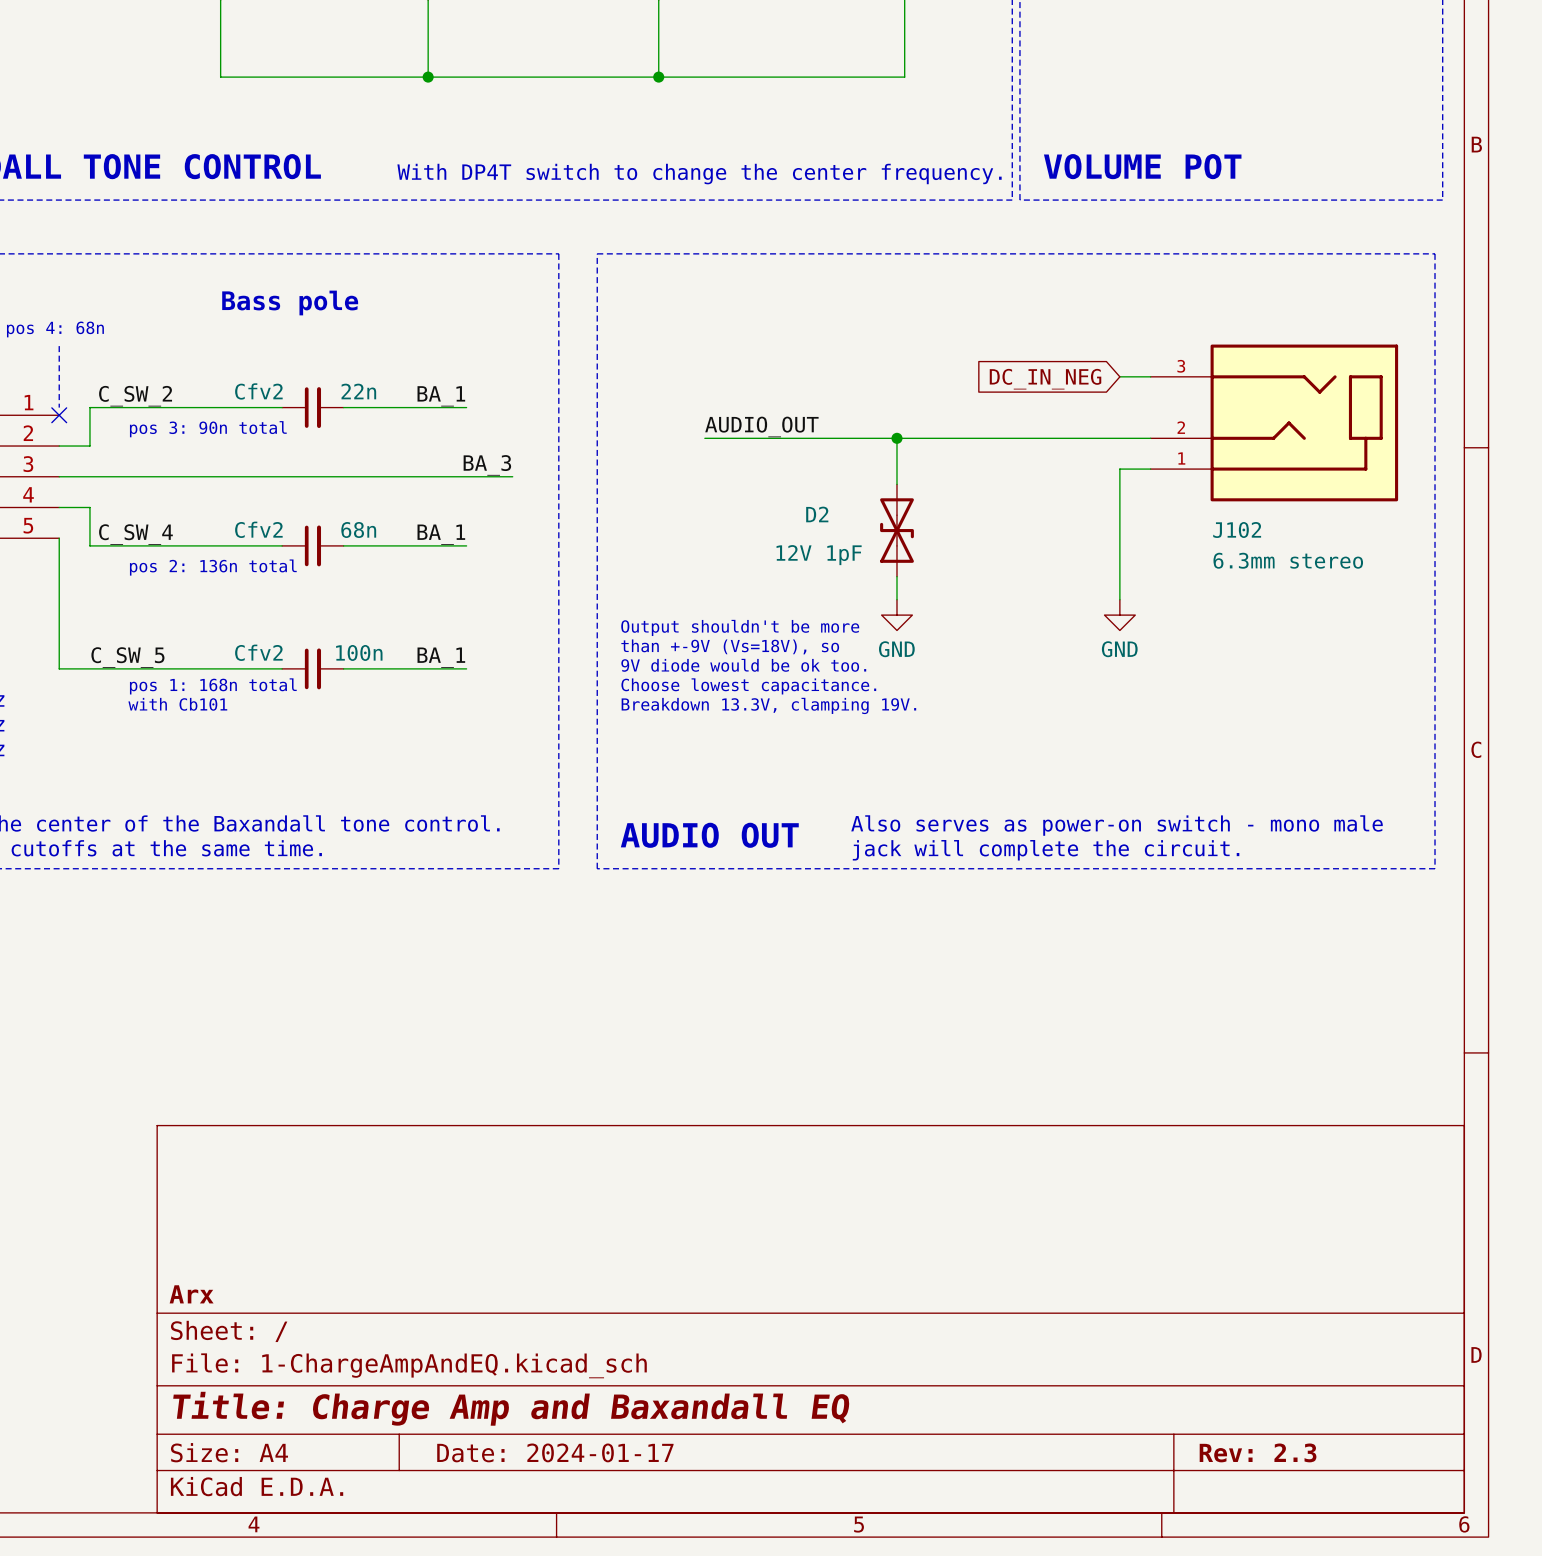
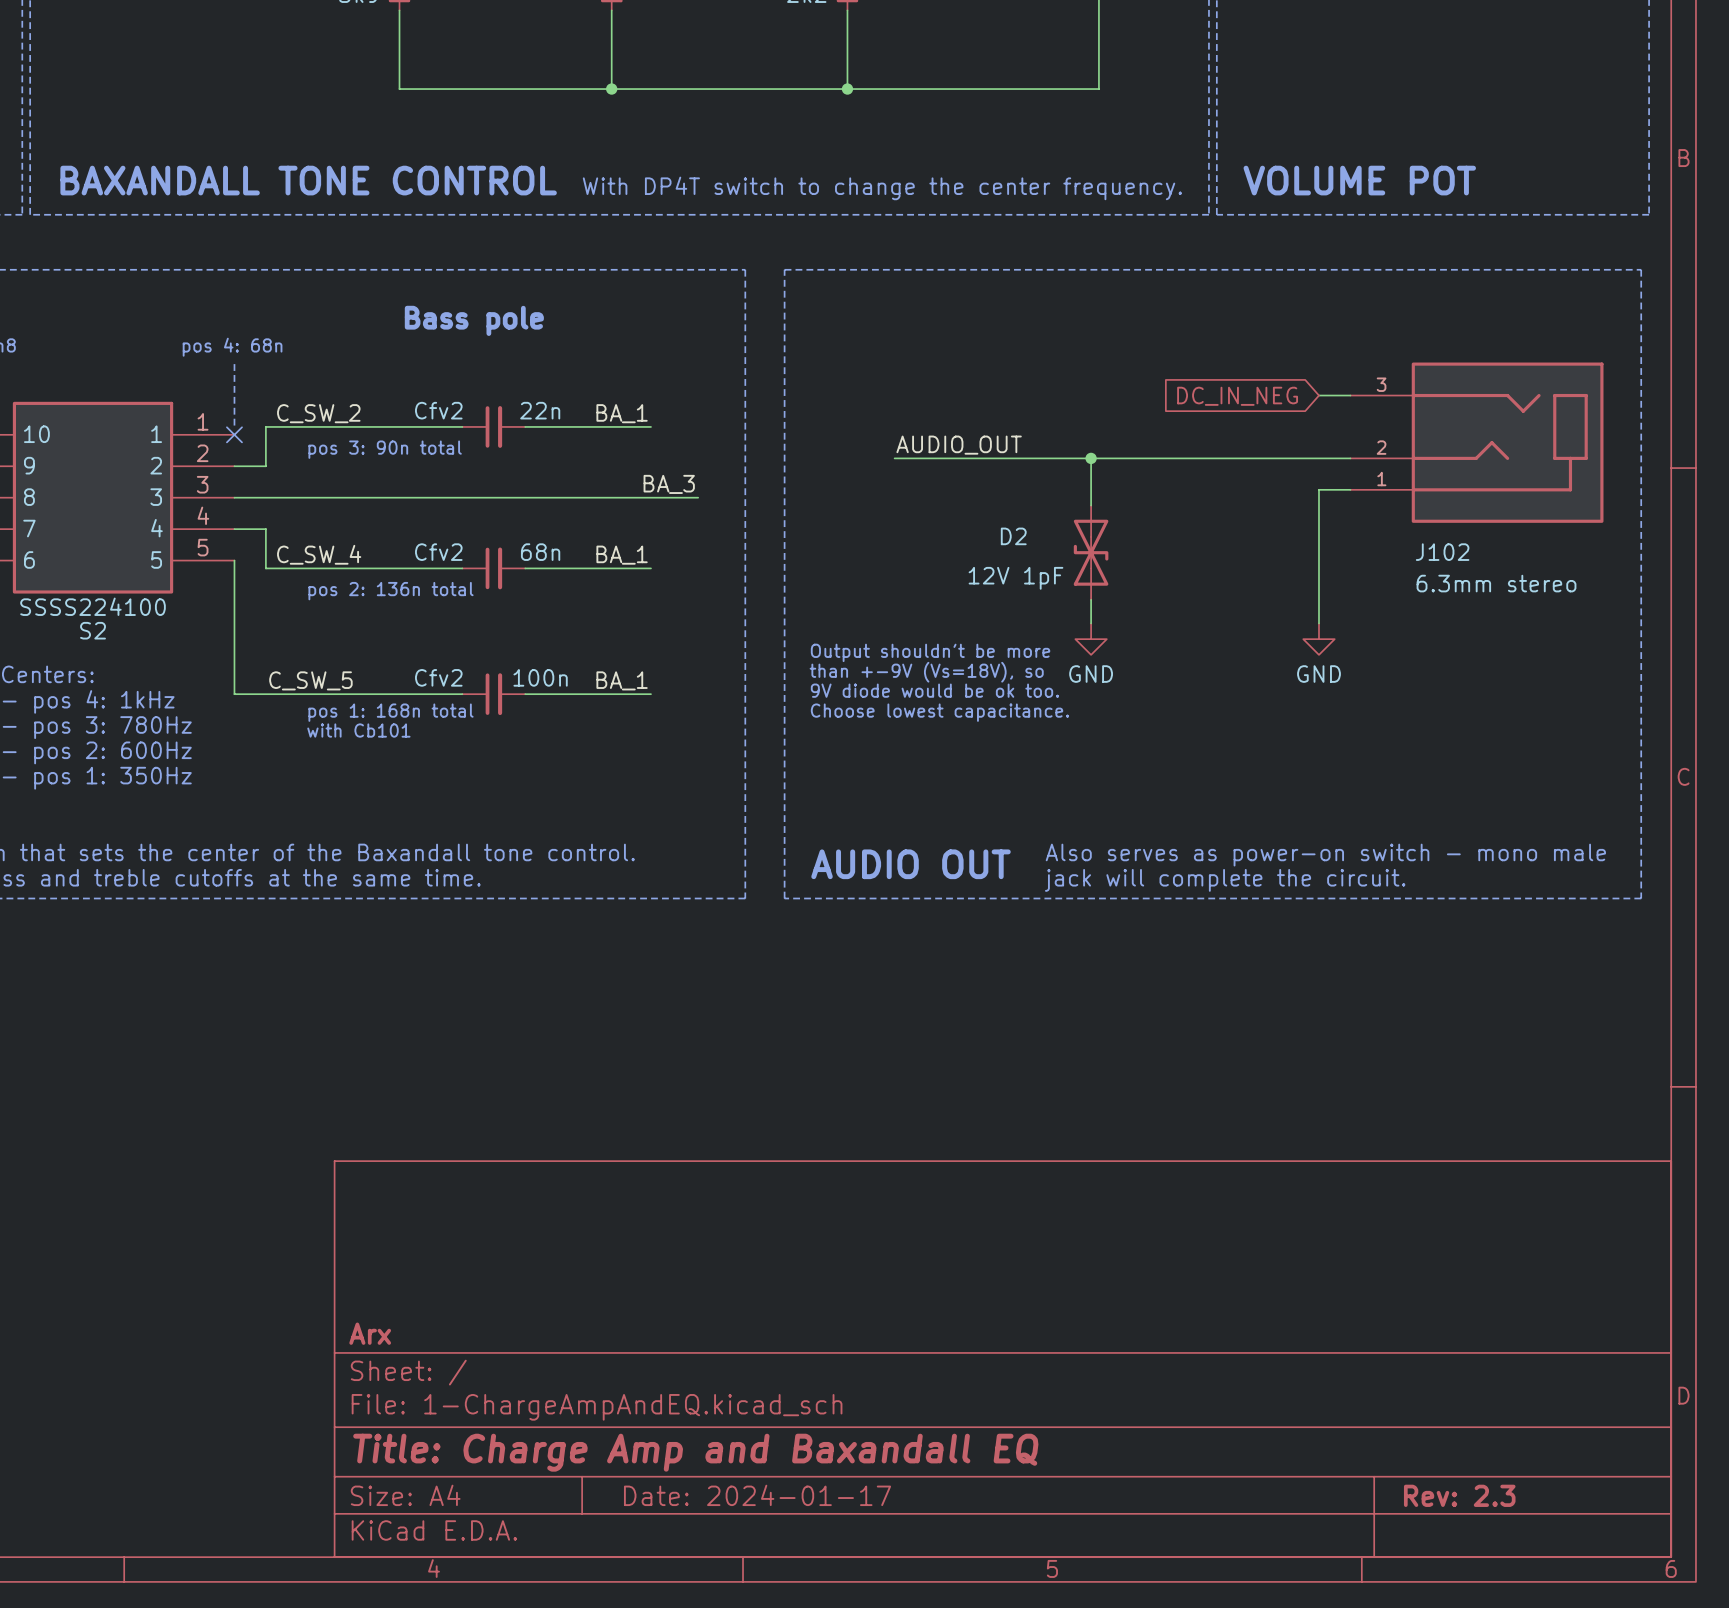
text: Breakdown 13.3V, clamping 19V. (768, 705) -> none

